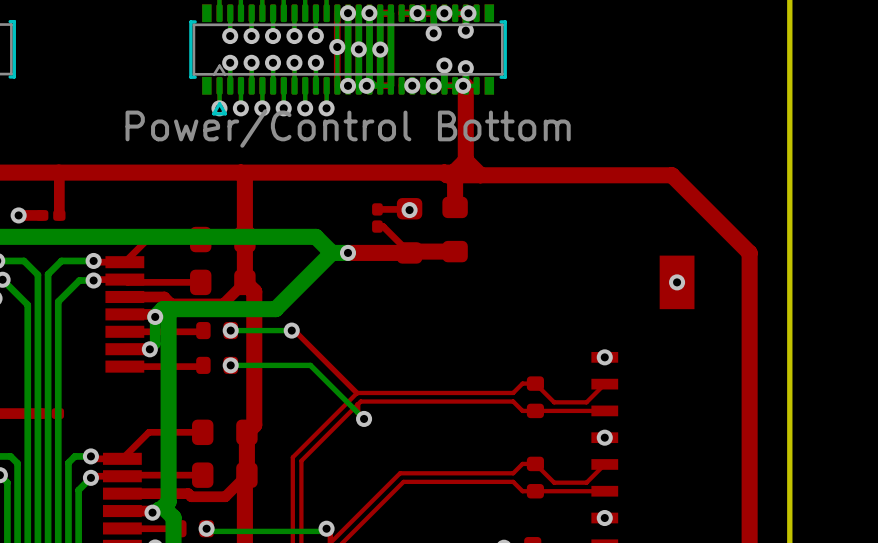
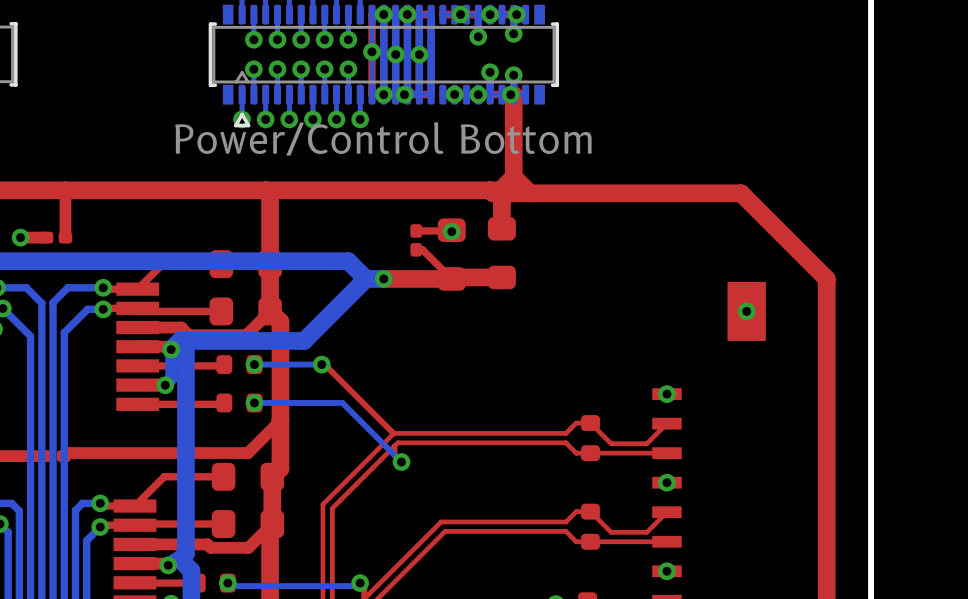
top track: none -> (280, 420) (248, 453) (66, 453) (63, 456)

